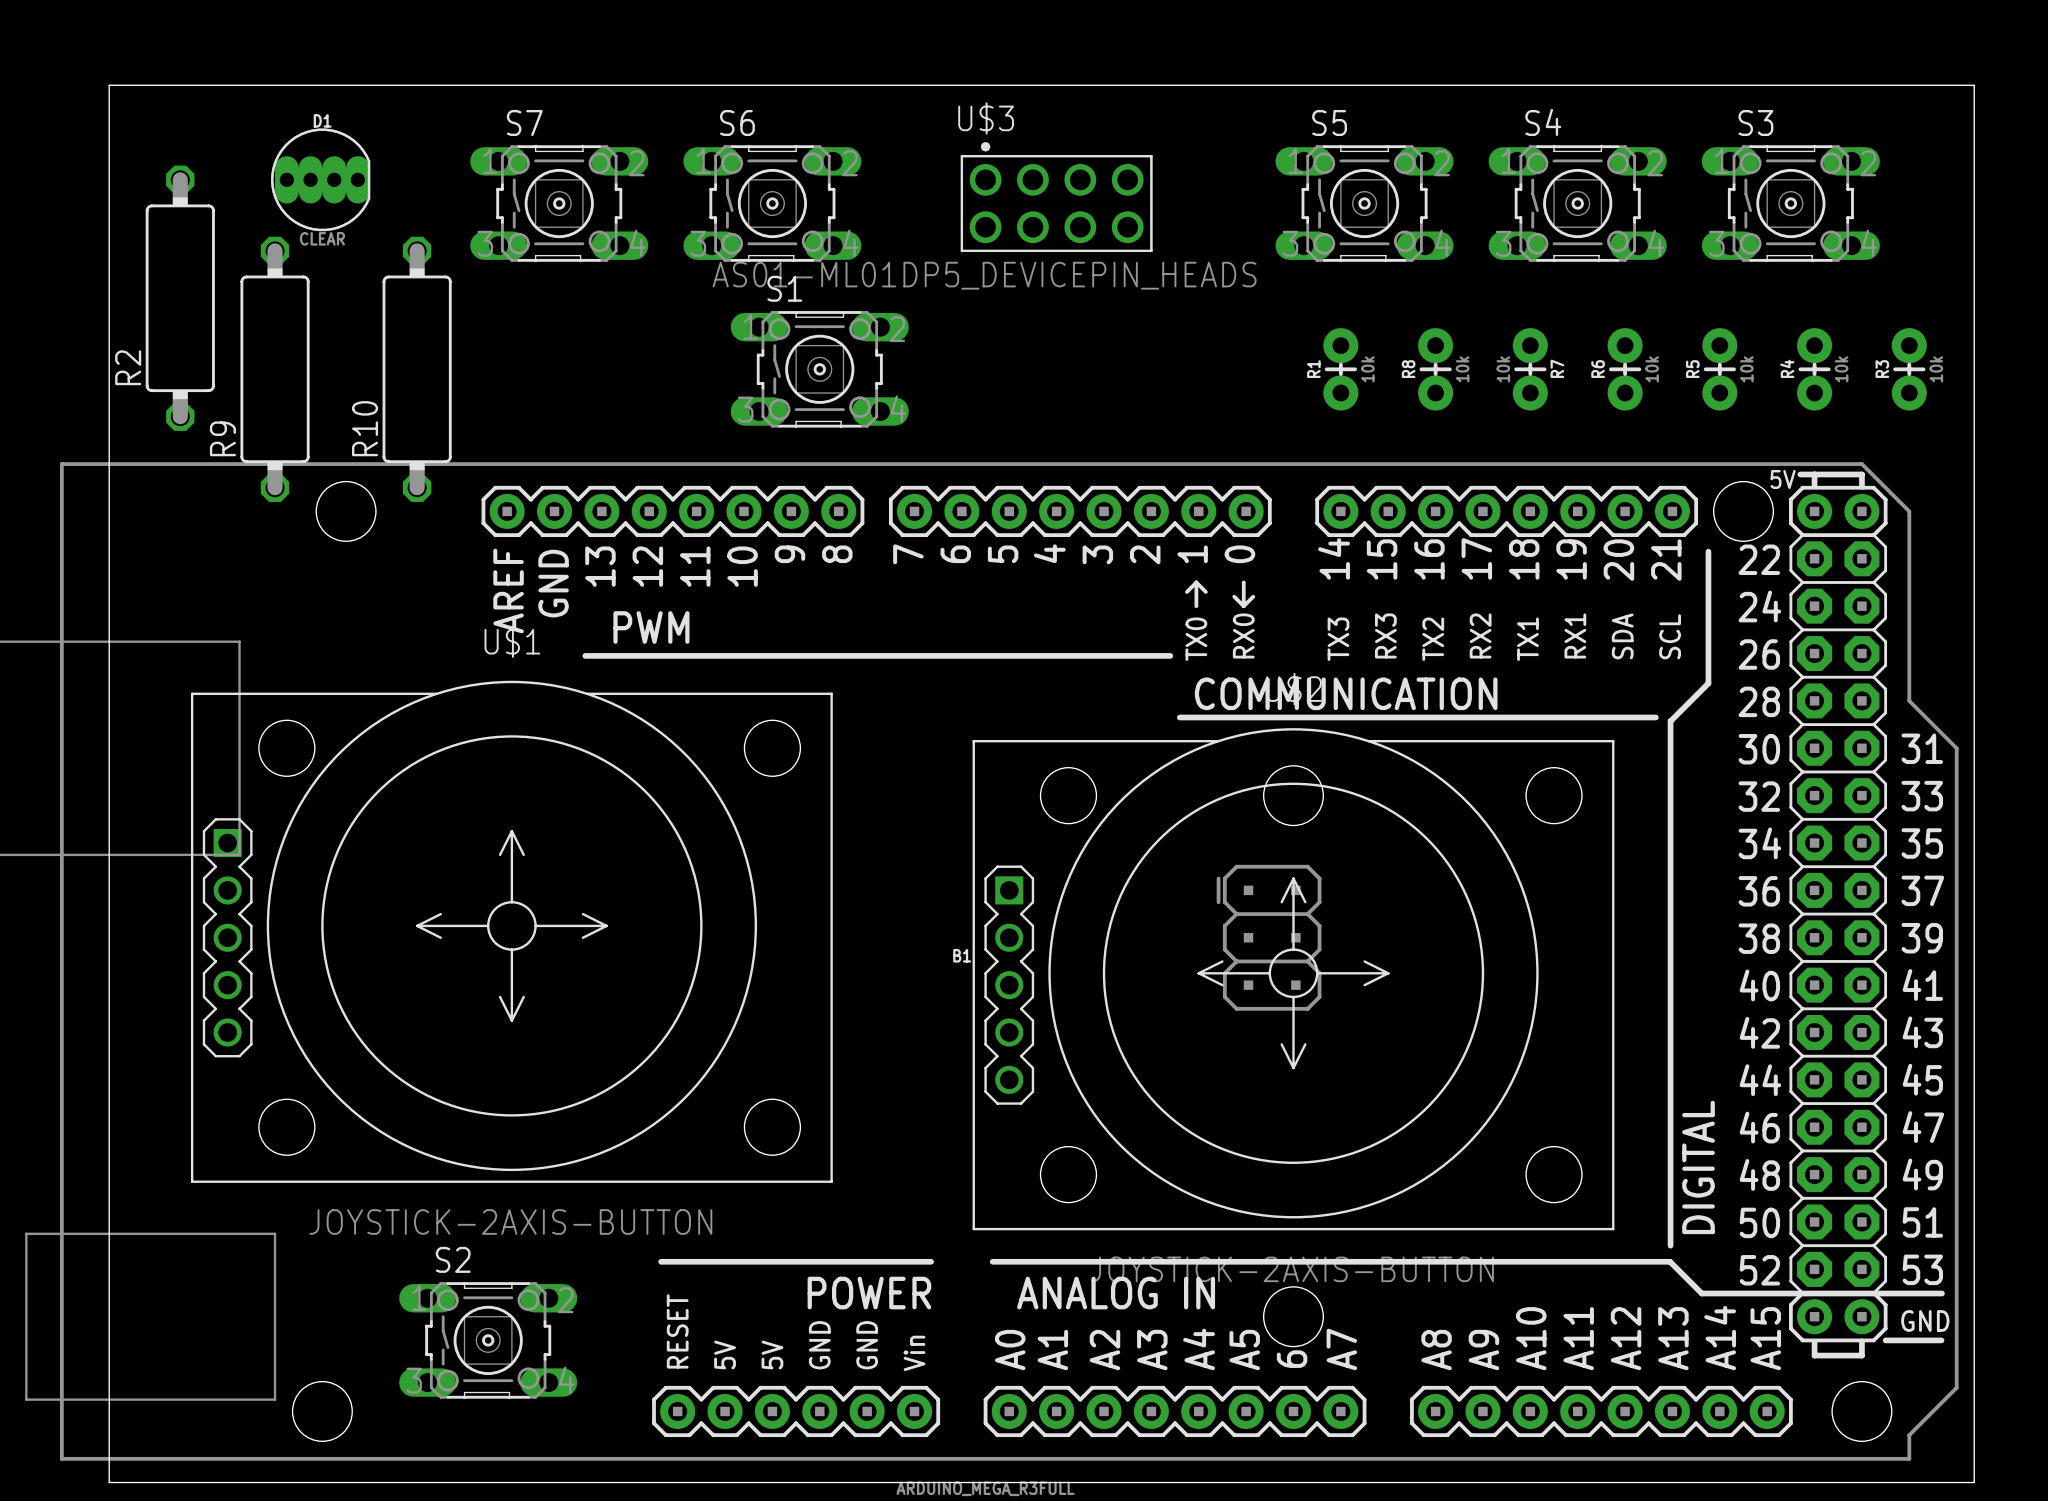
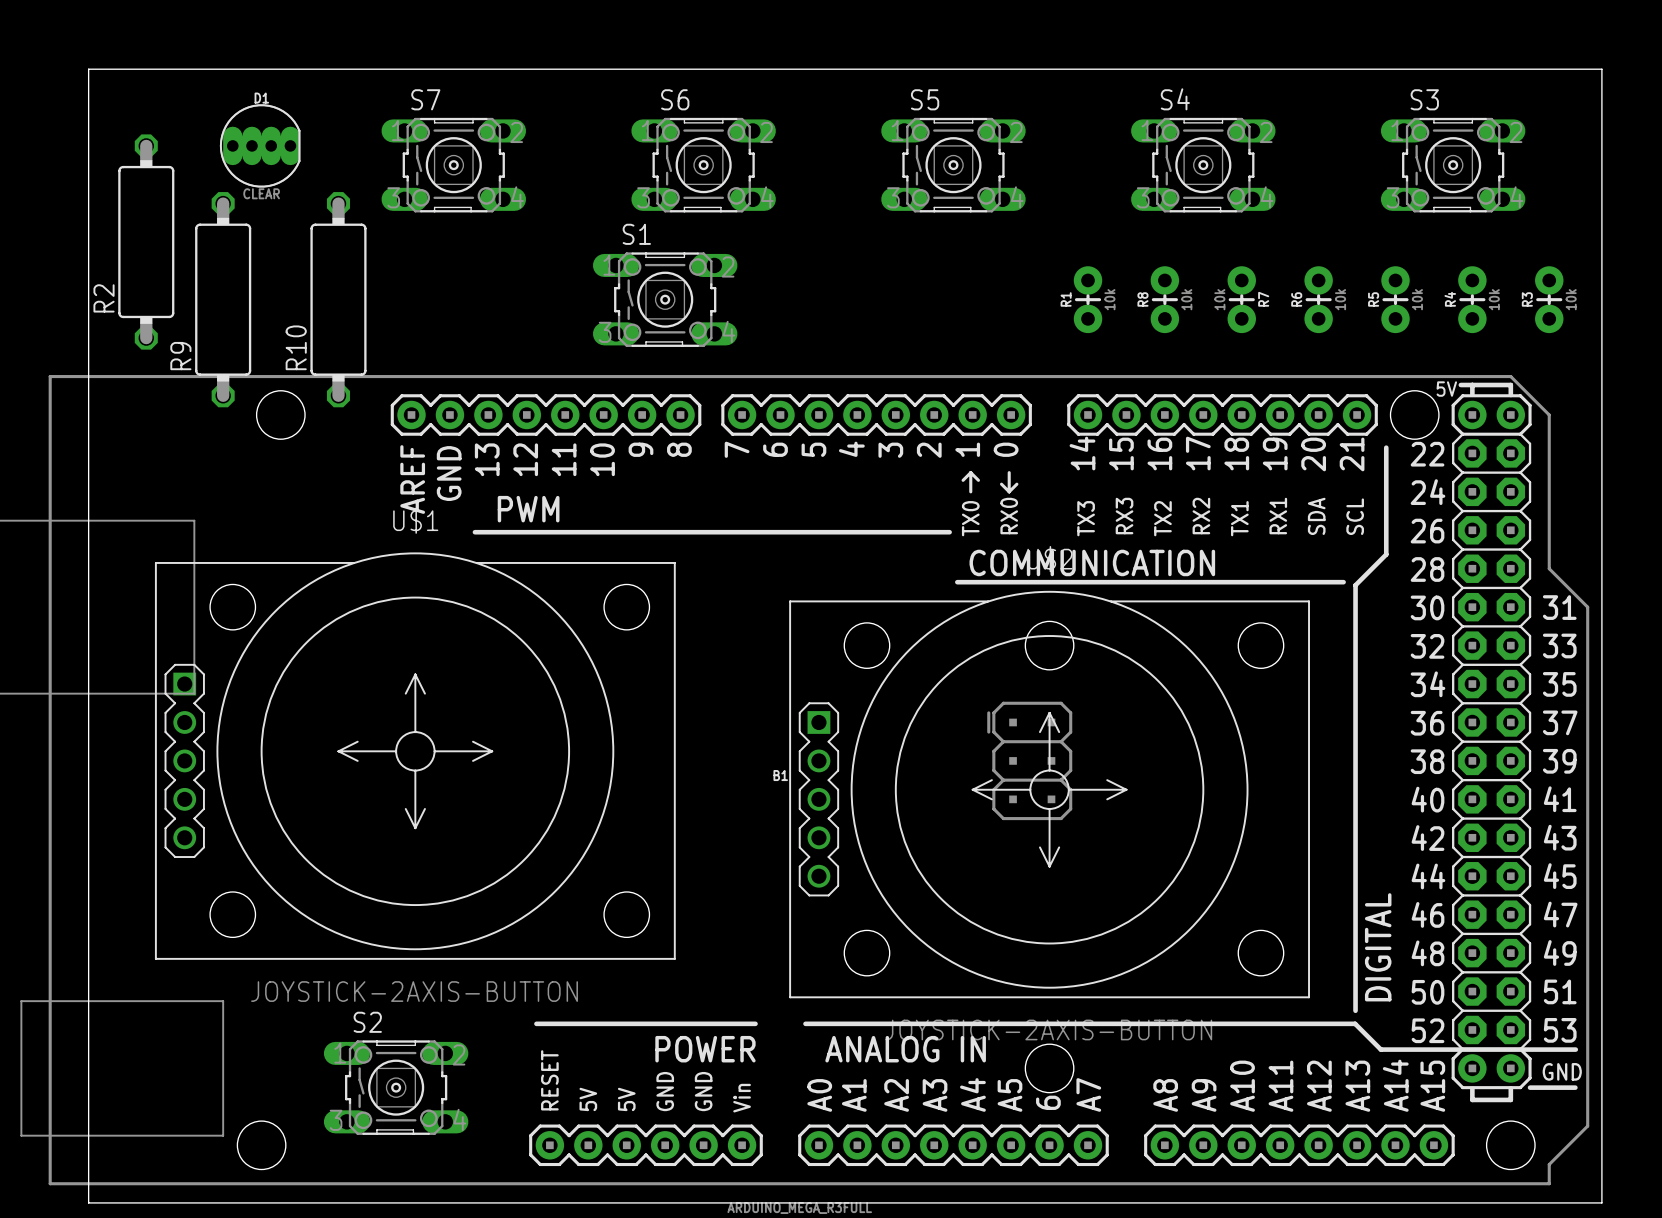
U$3: AS01-ML01DP5_DEVICEPIN_HEADS (1056, 197) -> none
S6 position: (772, 203) -> (703, 165)
S5 position: (1364, 203) -> (953, 165)
S4 position: (1577, 203) -> (1203, 165)

